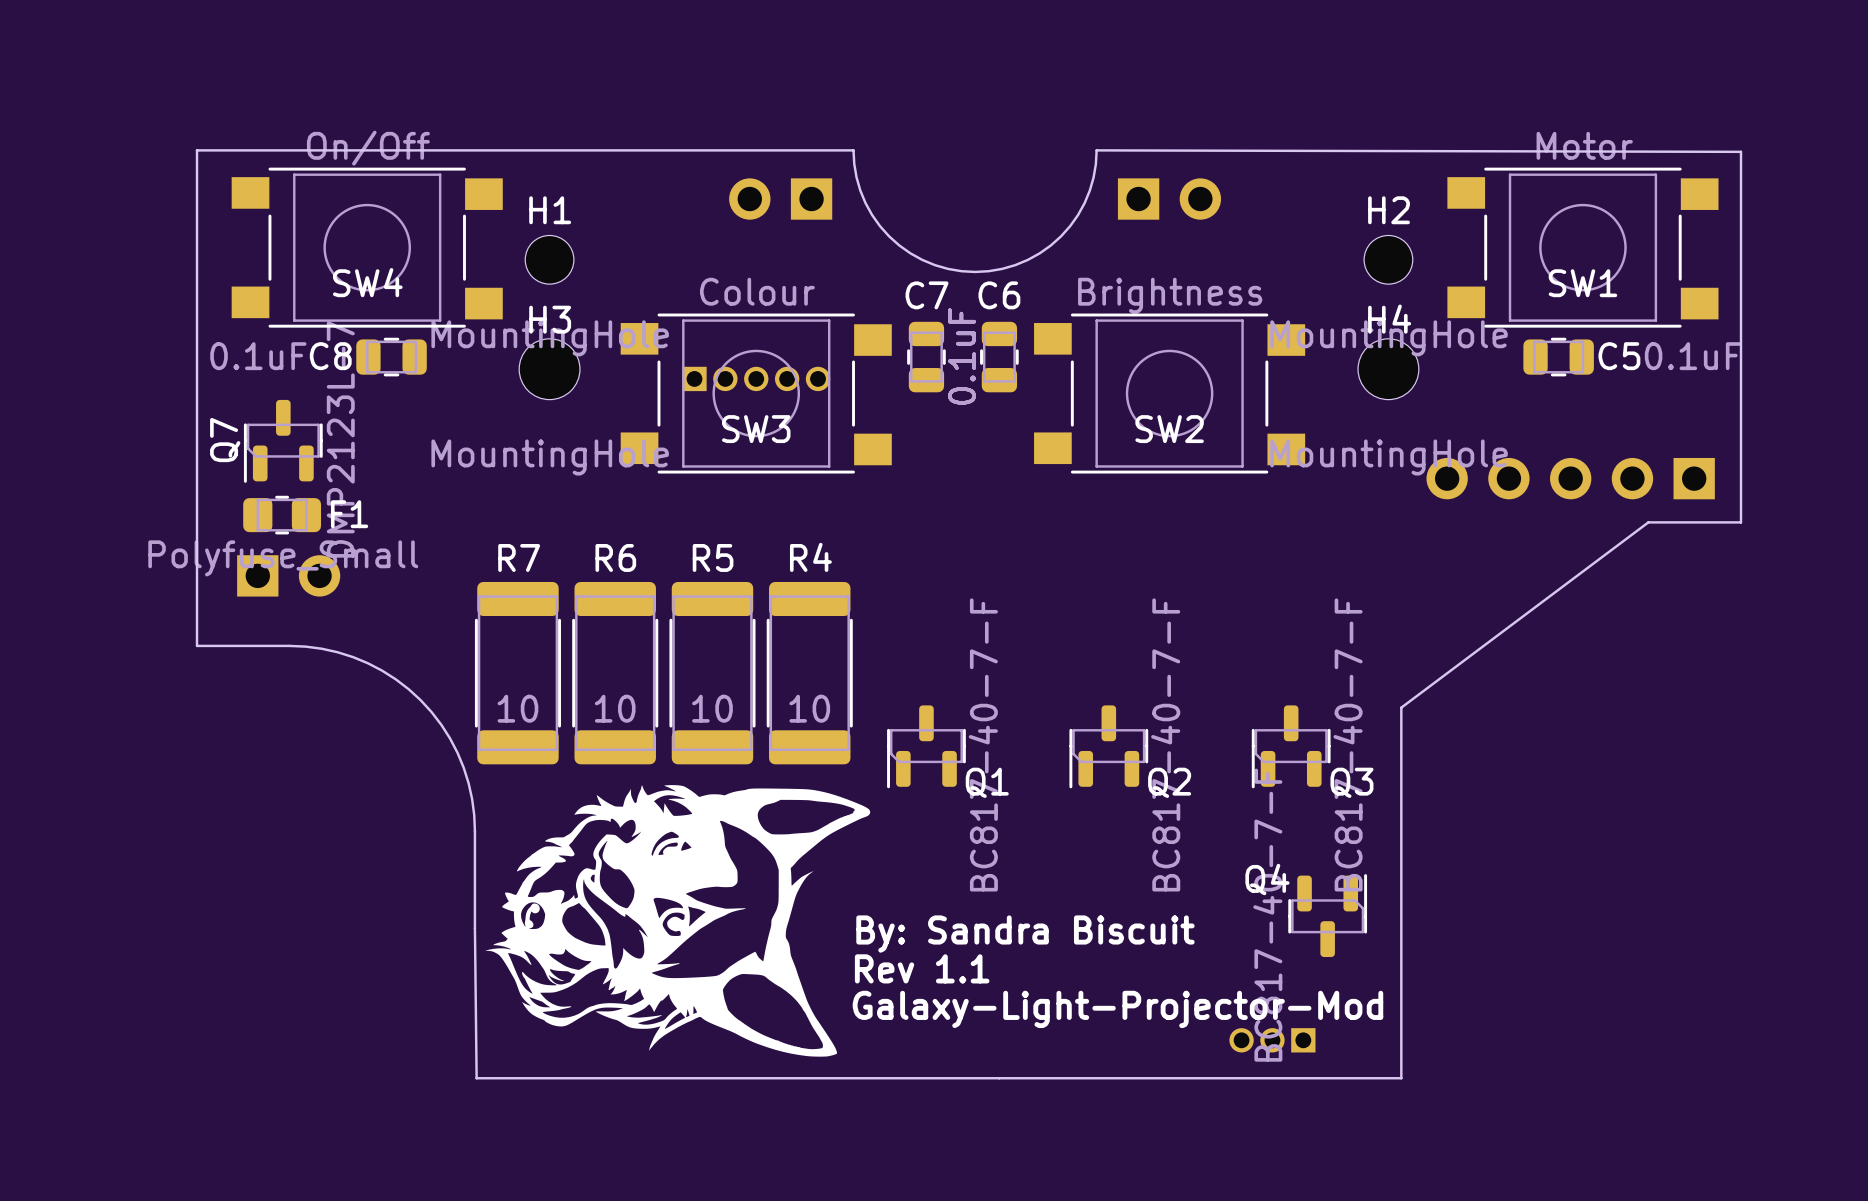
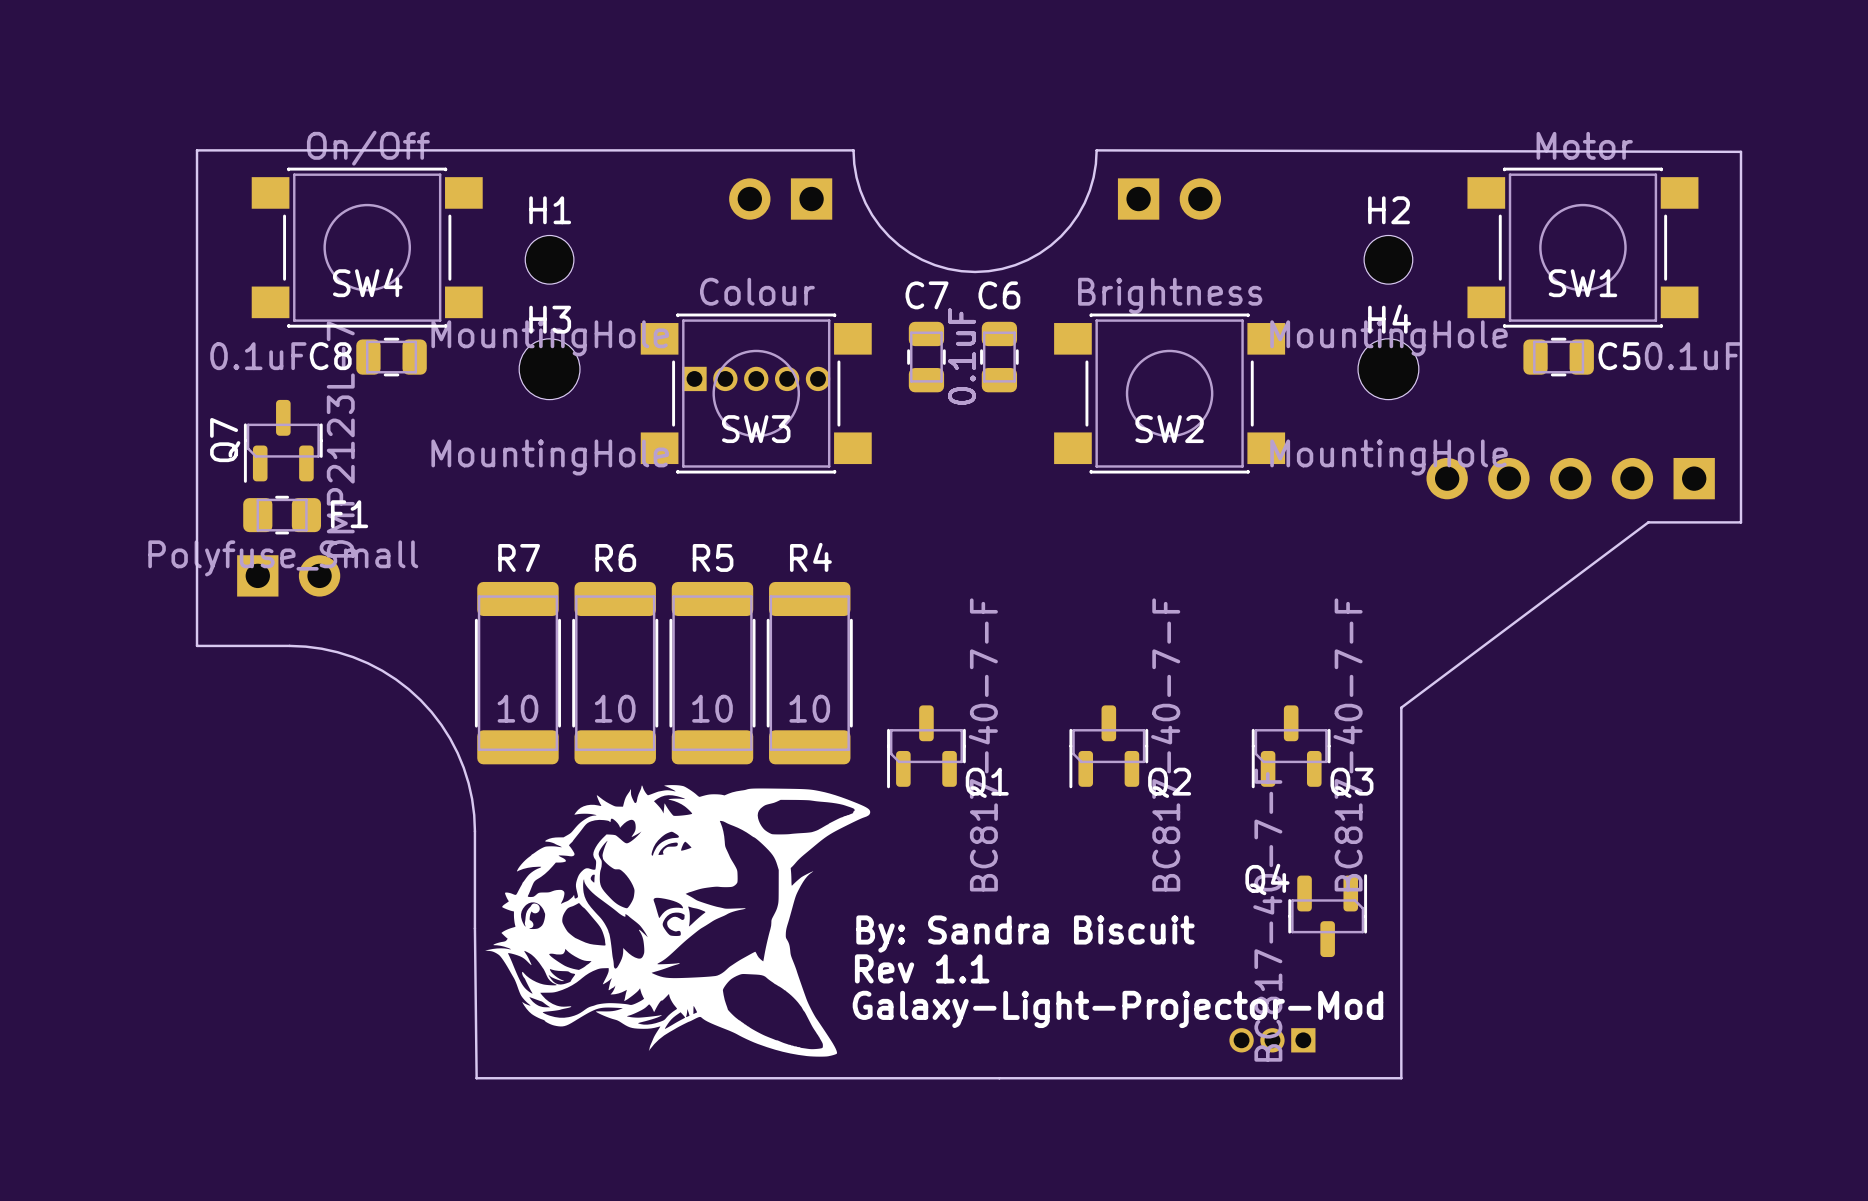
SW4 footprint: [231, 167, 503, 328] -> [251, 167, 483, 328]
SW1 footprint: [1447, 167, 1719, 328] -> [1467, 167, 1699, 328]
SW3 footprint: [620, 313, 892, 474] -> [640, 313, 872, 474]
SW2 footprint: [1034, 313, 1306, 474] -> [1054, 313, 1286, 474]

